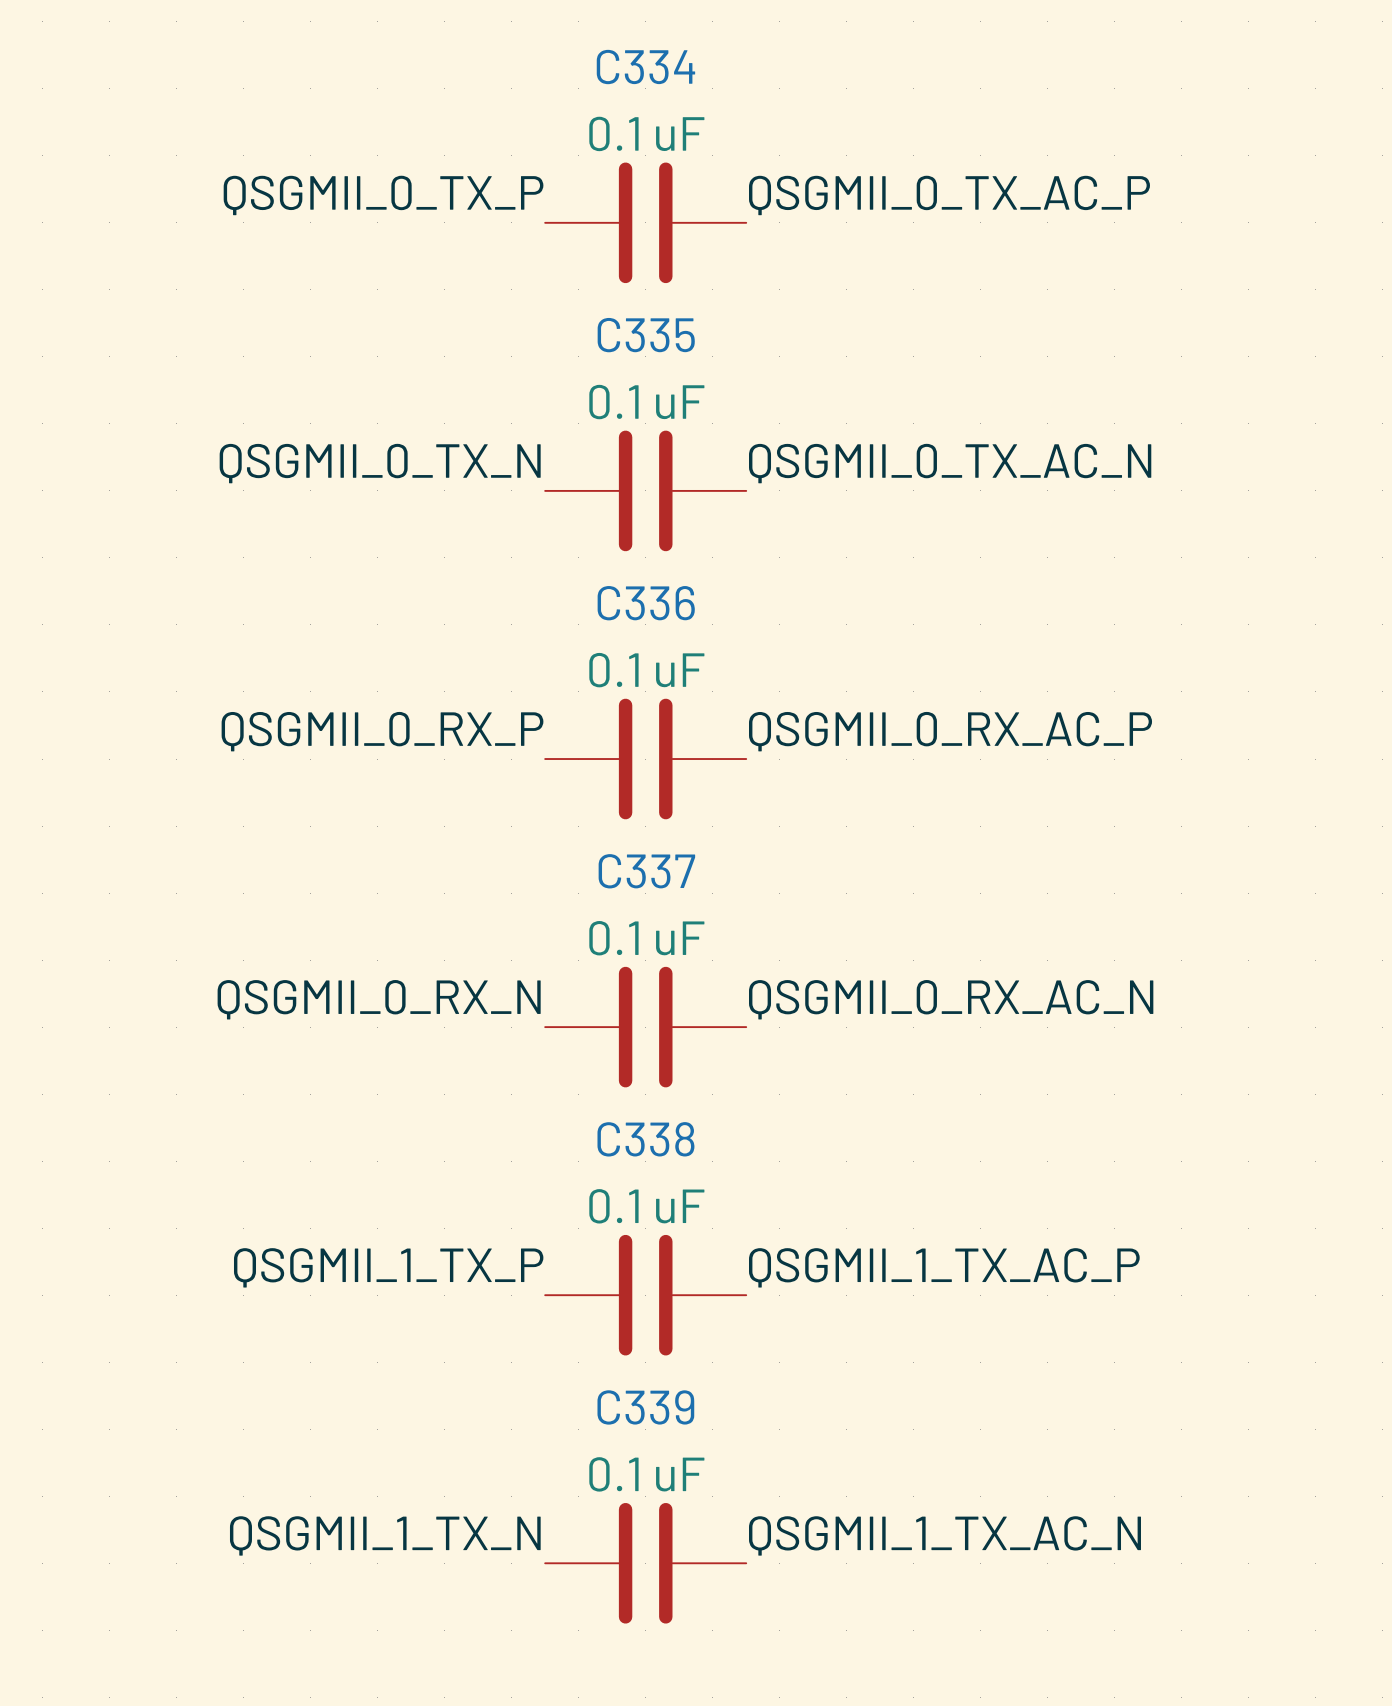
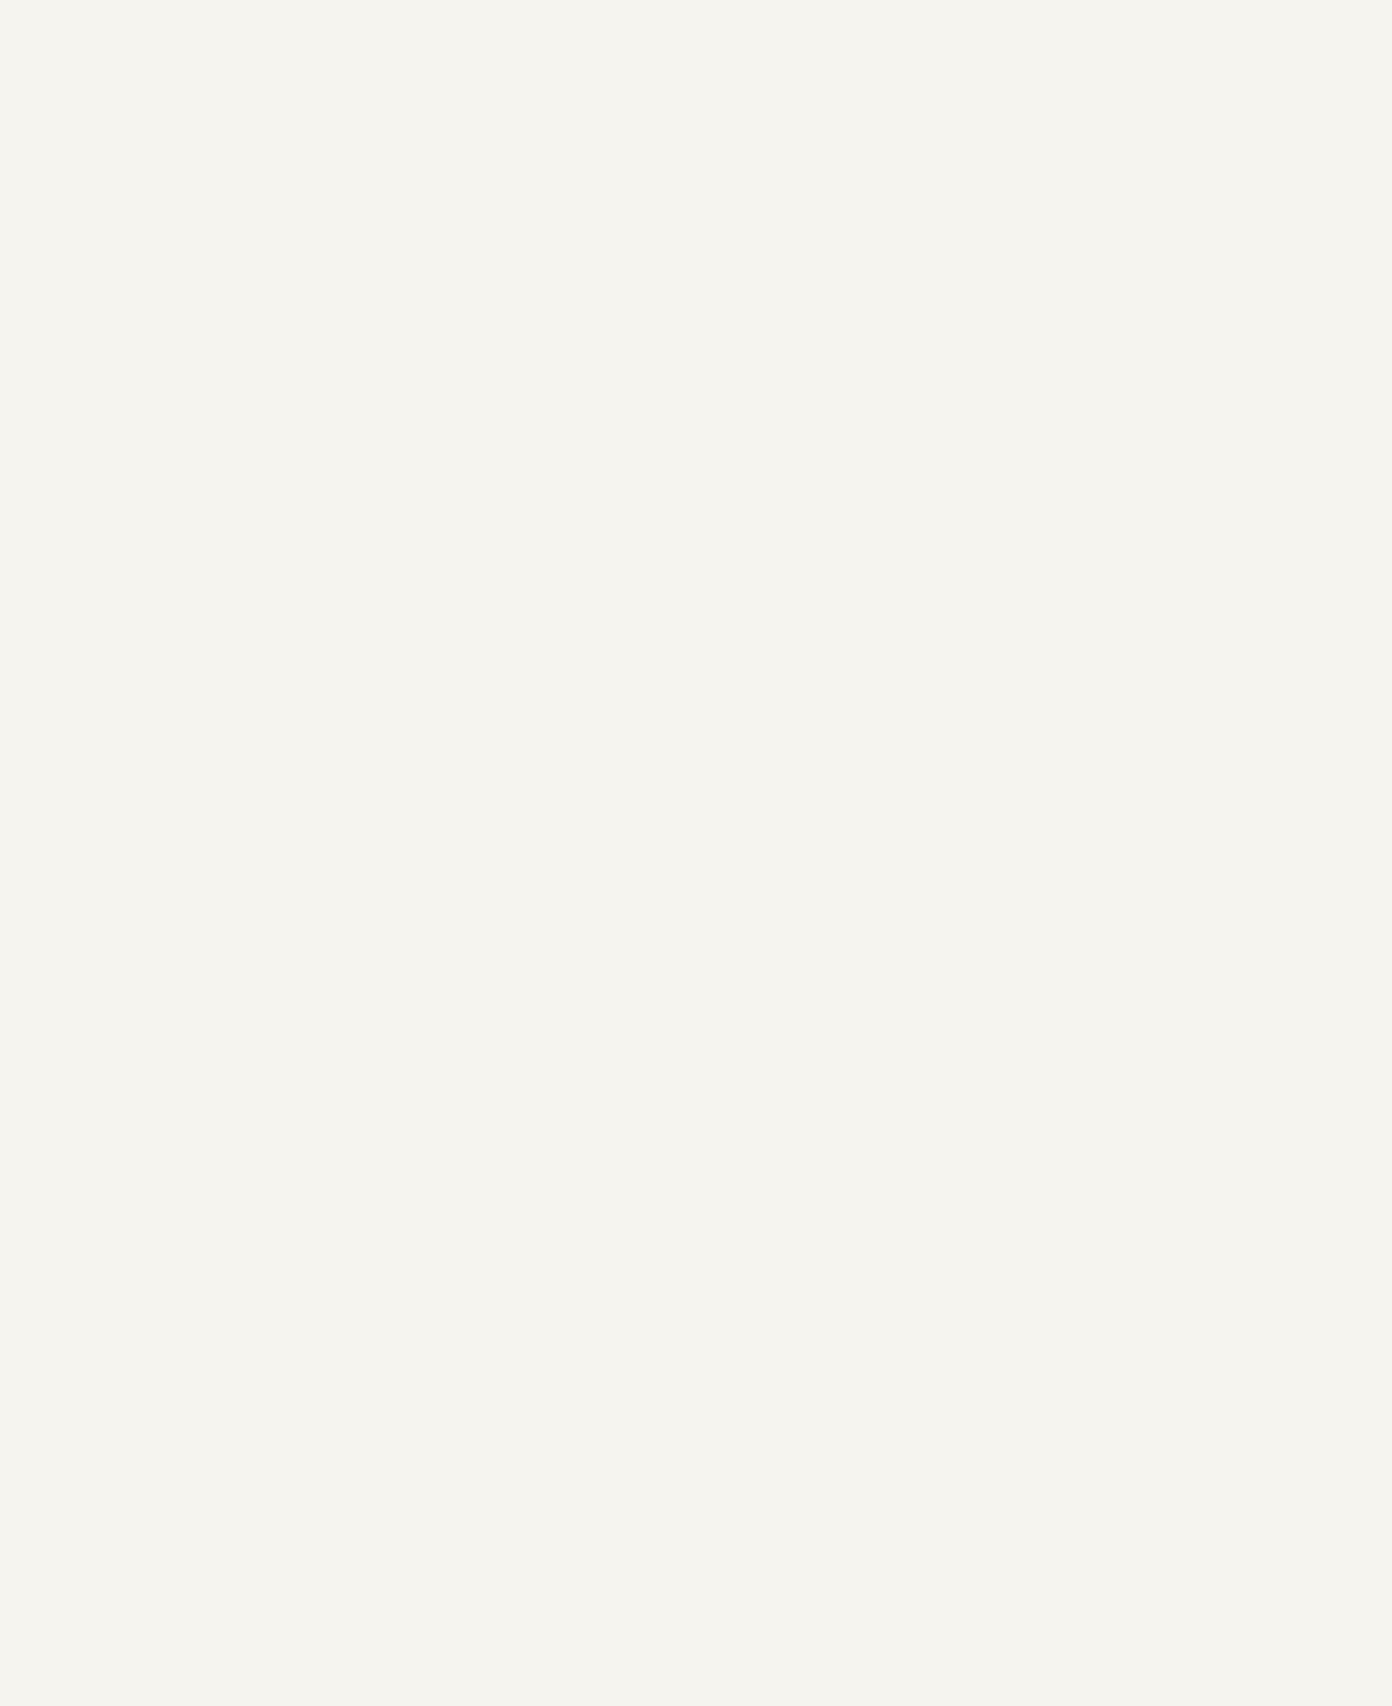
label: QSGMII_0_TX_P (383, 195) -> none
label: QSGMII_0_TX_AC_P (949, 195) -> none
C334: 0.1 uF (645, 222) -> none
label: QSGMII_0_TX_N (380, 463) -> none
label: QSGMII_0_TX_AC_N (950, 463) -> none
C335: 0.1 uF (645, 490) -> none
label: QSGMII_0_RX_P (382, 731) -> none
label: QSGMII_0_RX_AC_P (950, 731) -> none
C336: 0.1 uF (645, 759) -> none
label: QSGMII_0_RX_N (379, 999) -> none
label: QSGMII_0_RX_AC_N (951, 999) -> none
C337: 0.1 uF (645, 1027) -> none
label: QSGMII_1_TX_P (388, 1267) -> none
label: QSGMII_1_TX_AC_P (944, 1267) -> none
C338: 0.1 uF (645, 1295) -> none
label: QSGMII_1_TX_N (385, 1535) -> none
label: QSGMII_1_TX_AC_N (944, 1535) -> none
C339: 0.1 uF (645, 1563) -> none

